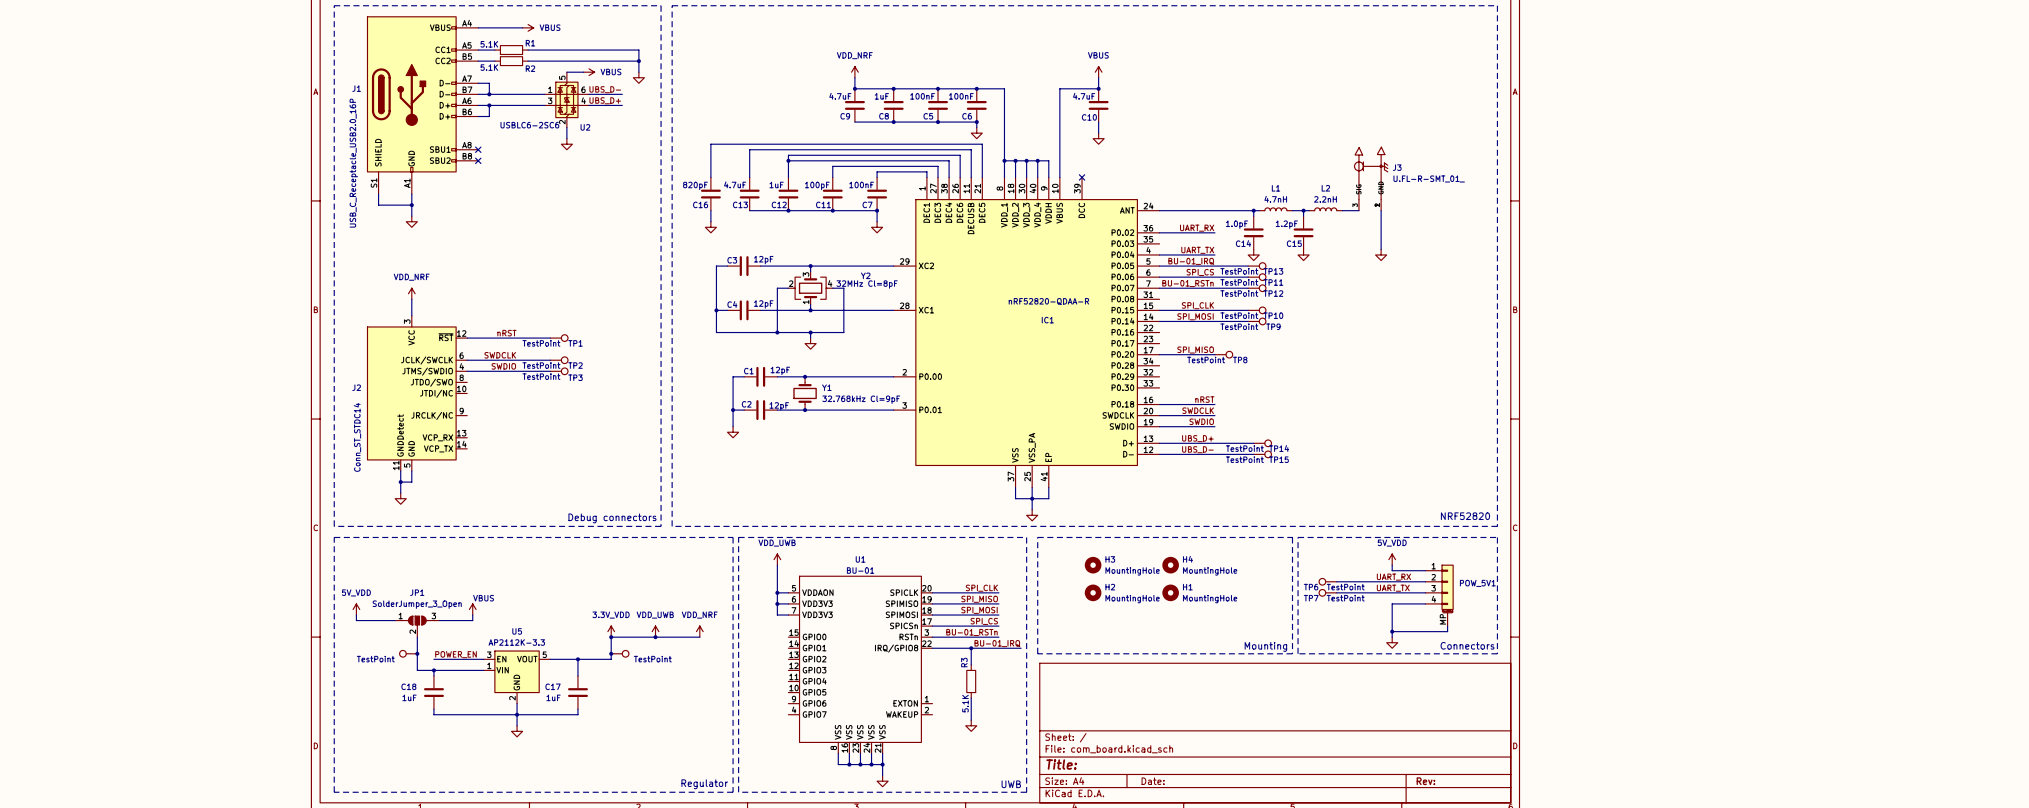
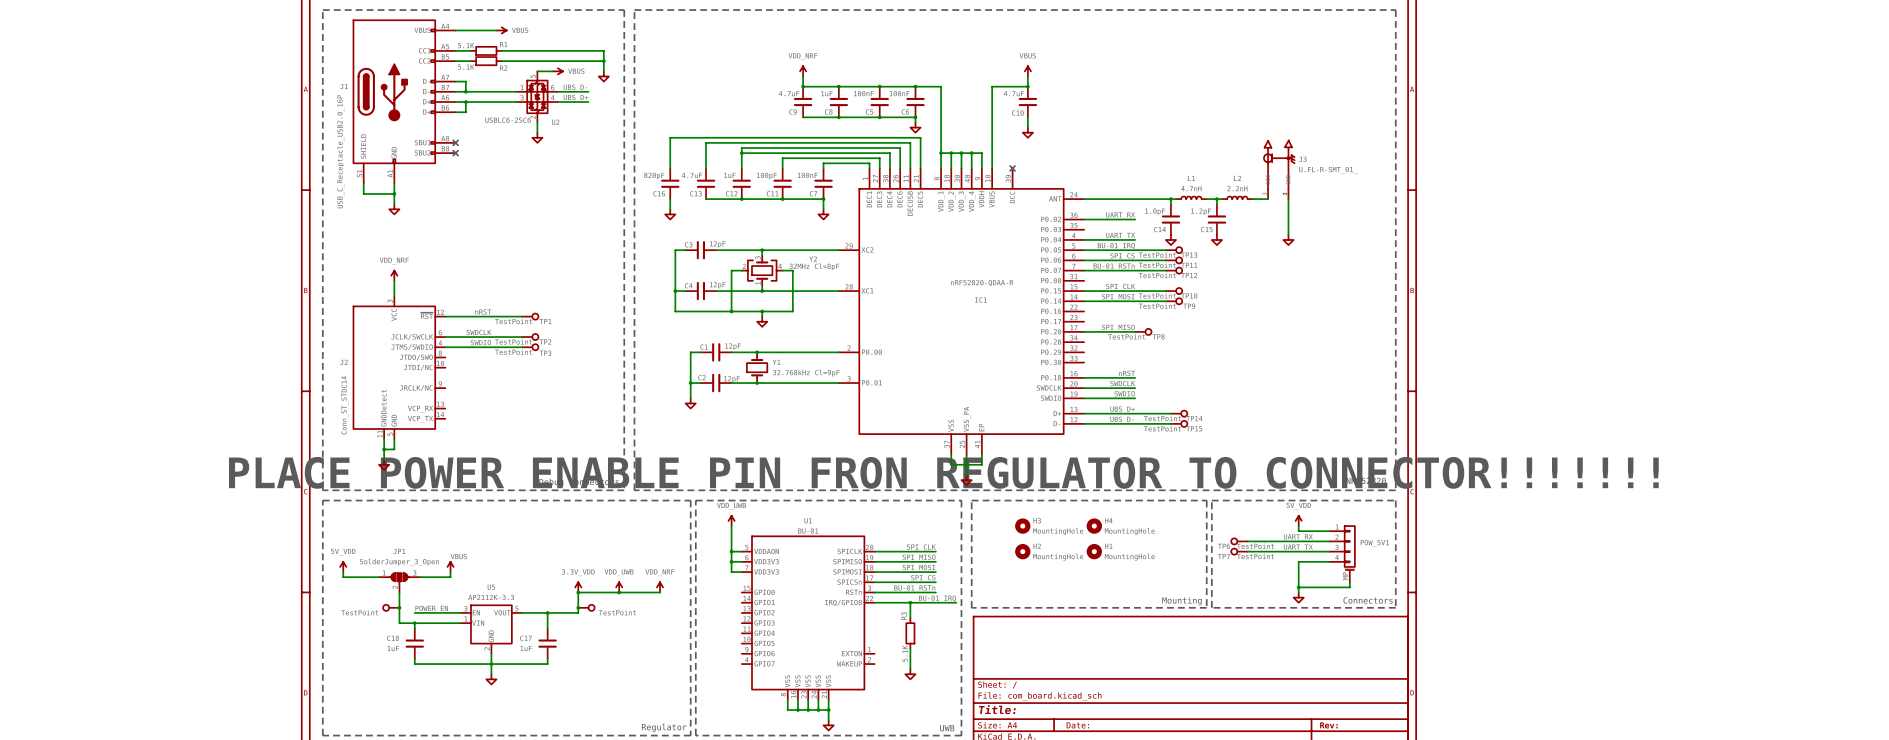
text: none -> PLACE POWER ENABLE PIN FRON REGULATOR TO CONNECTOR!!!!!!! (943, 472)

